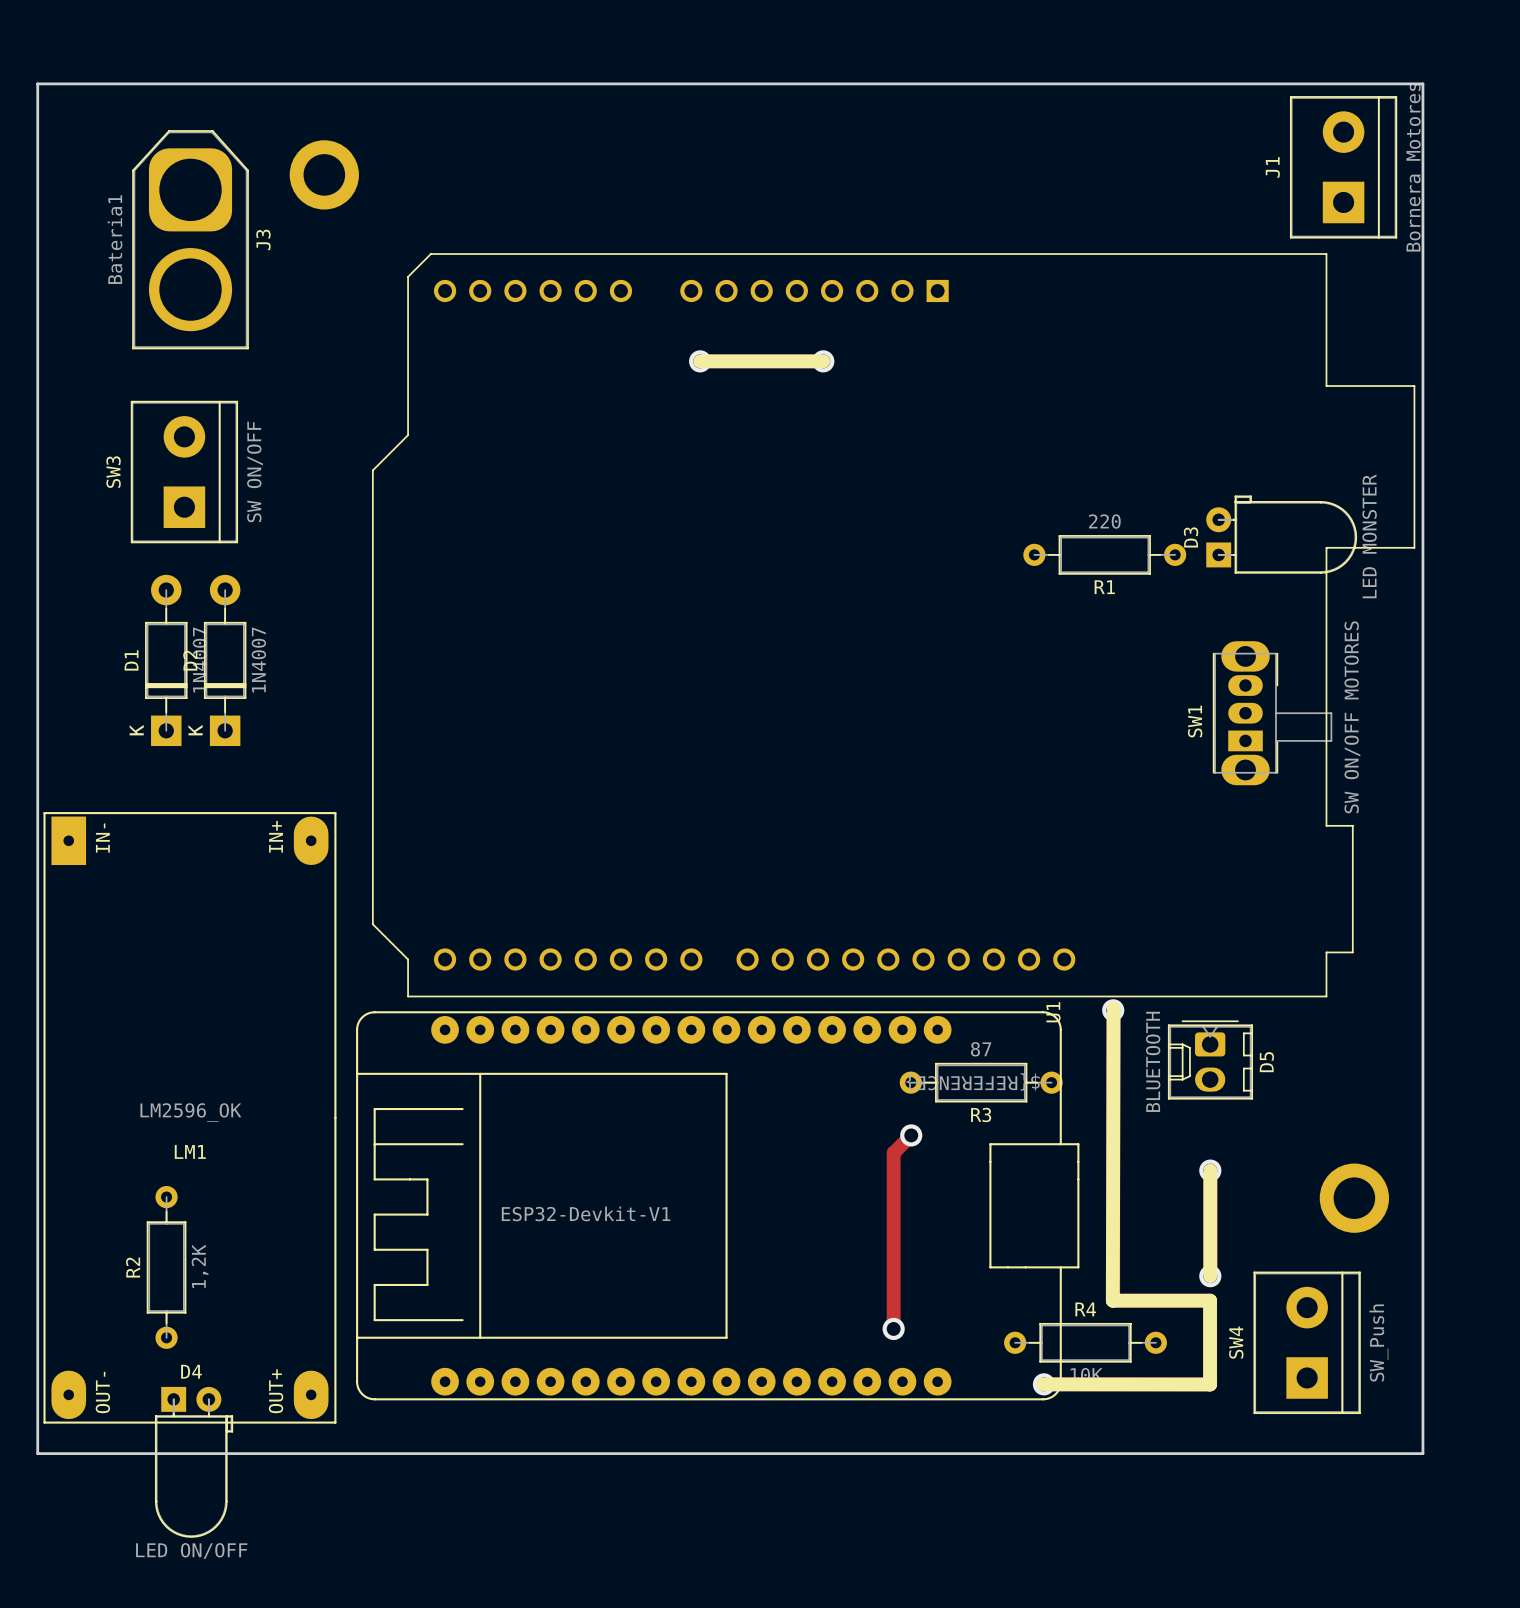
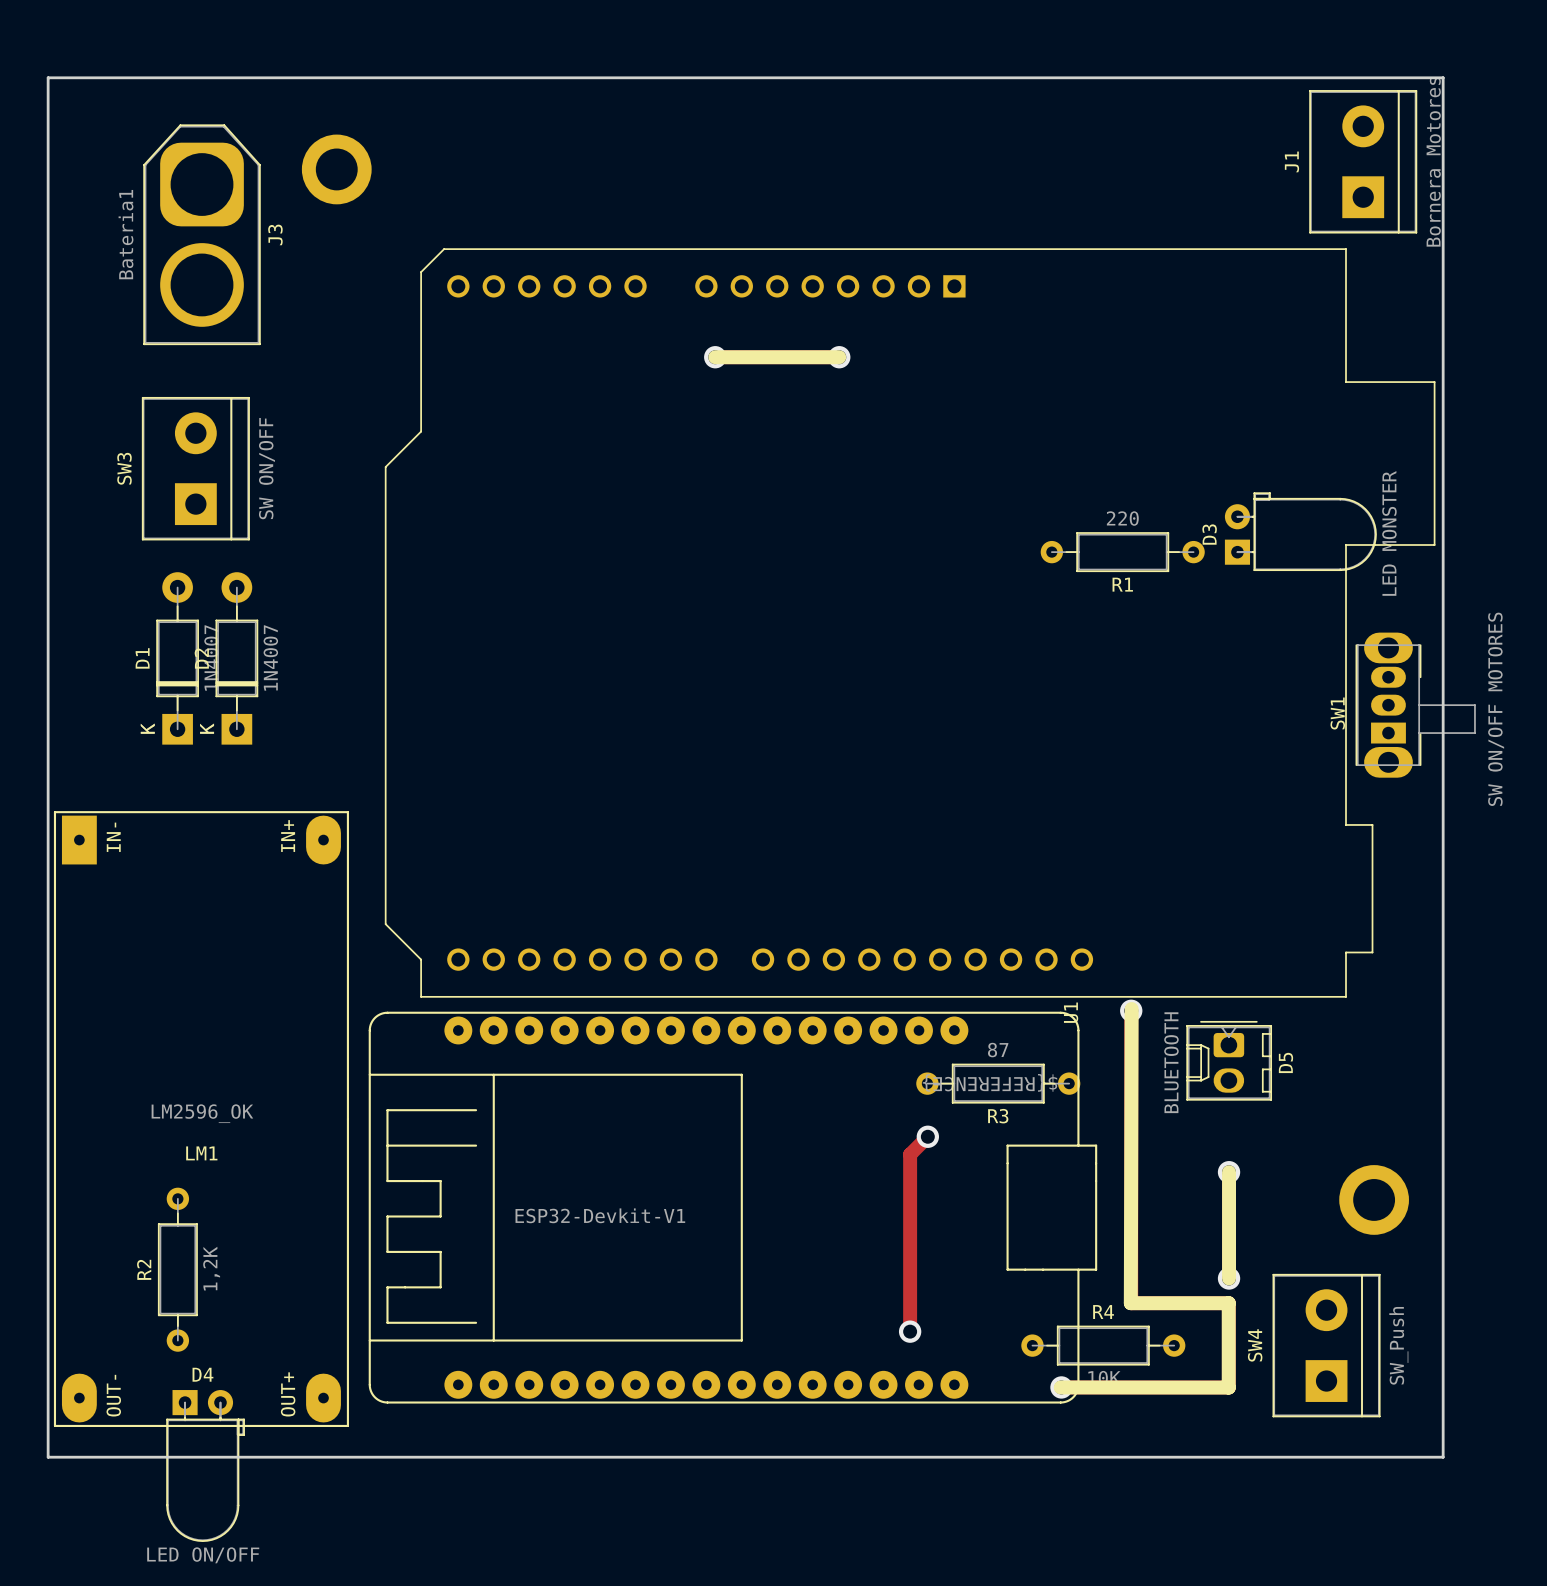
SW1 position: (1272, 713) -> (1415, 705)

